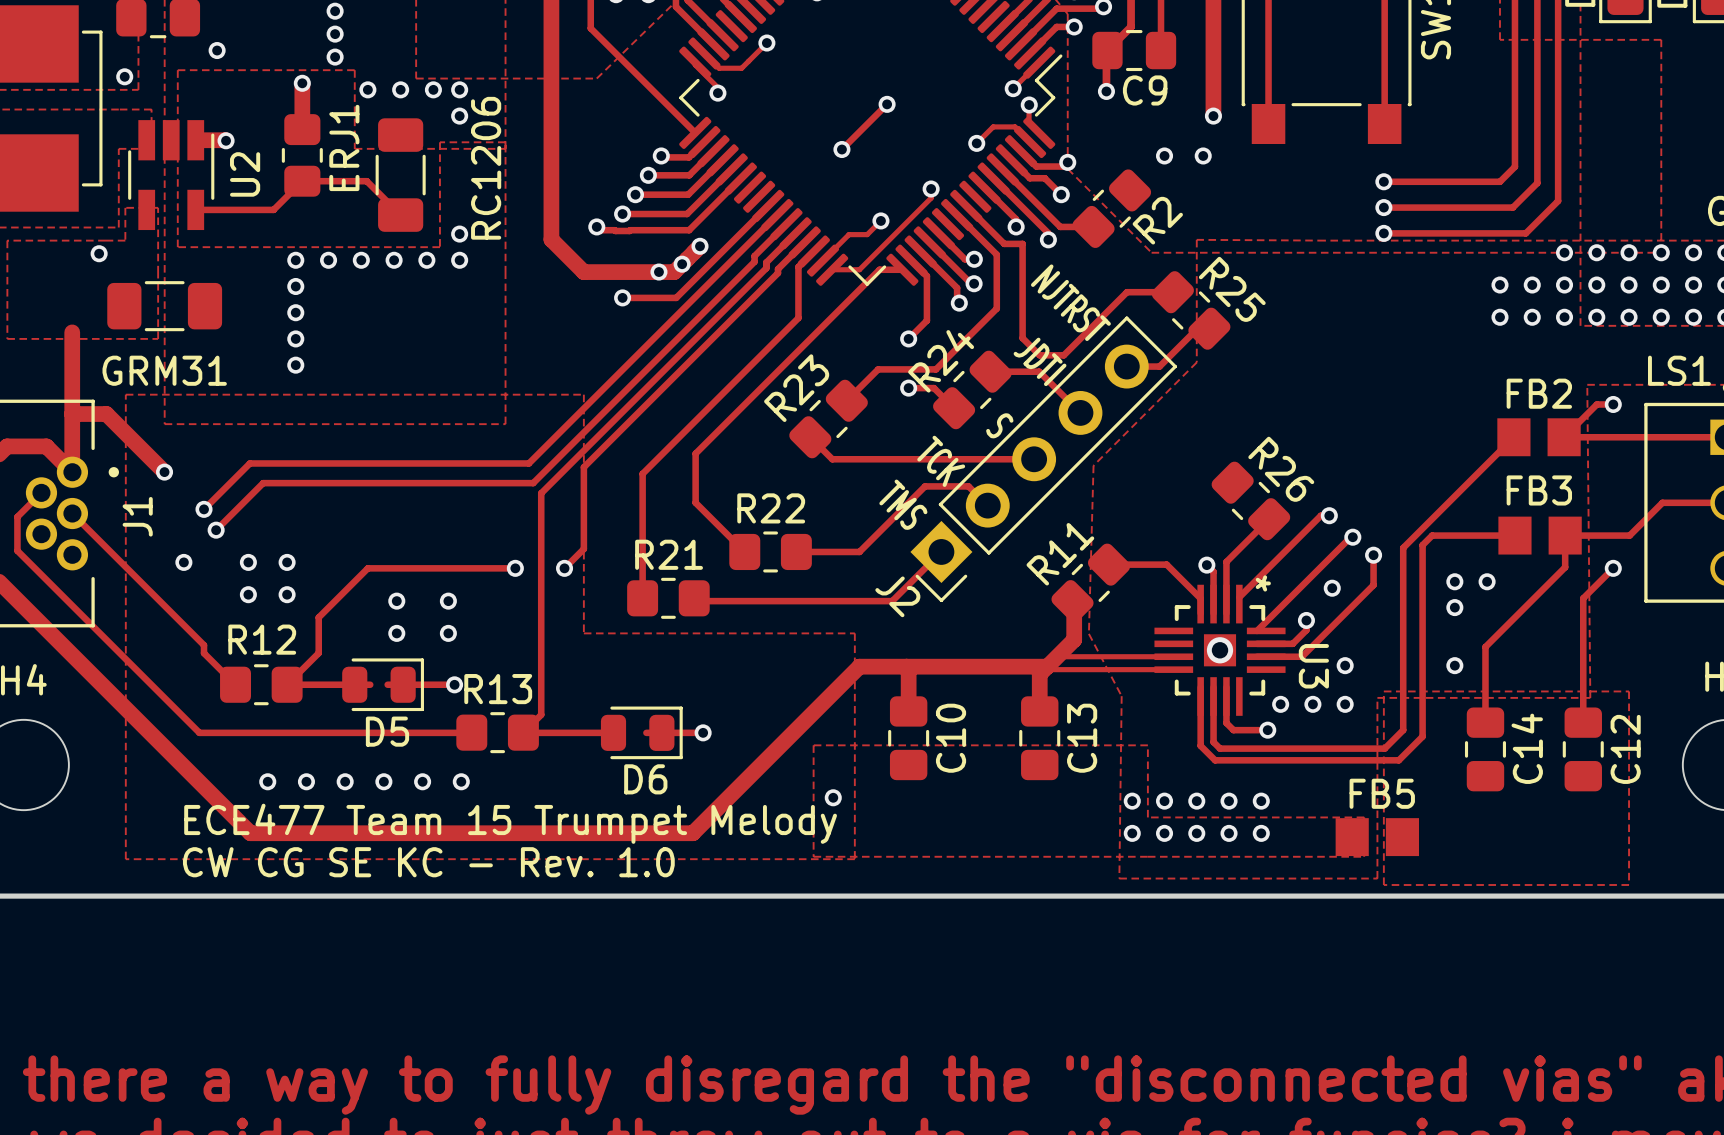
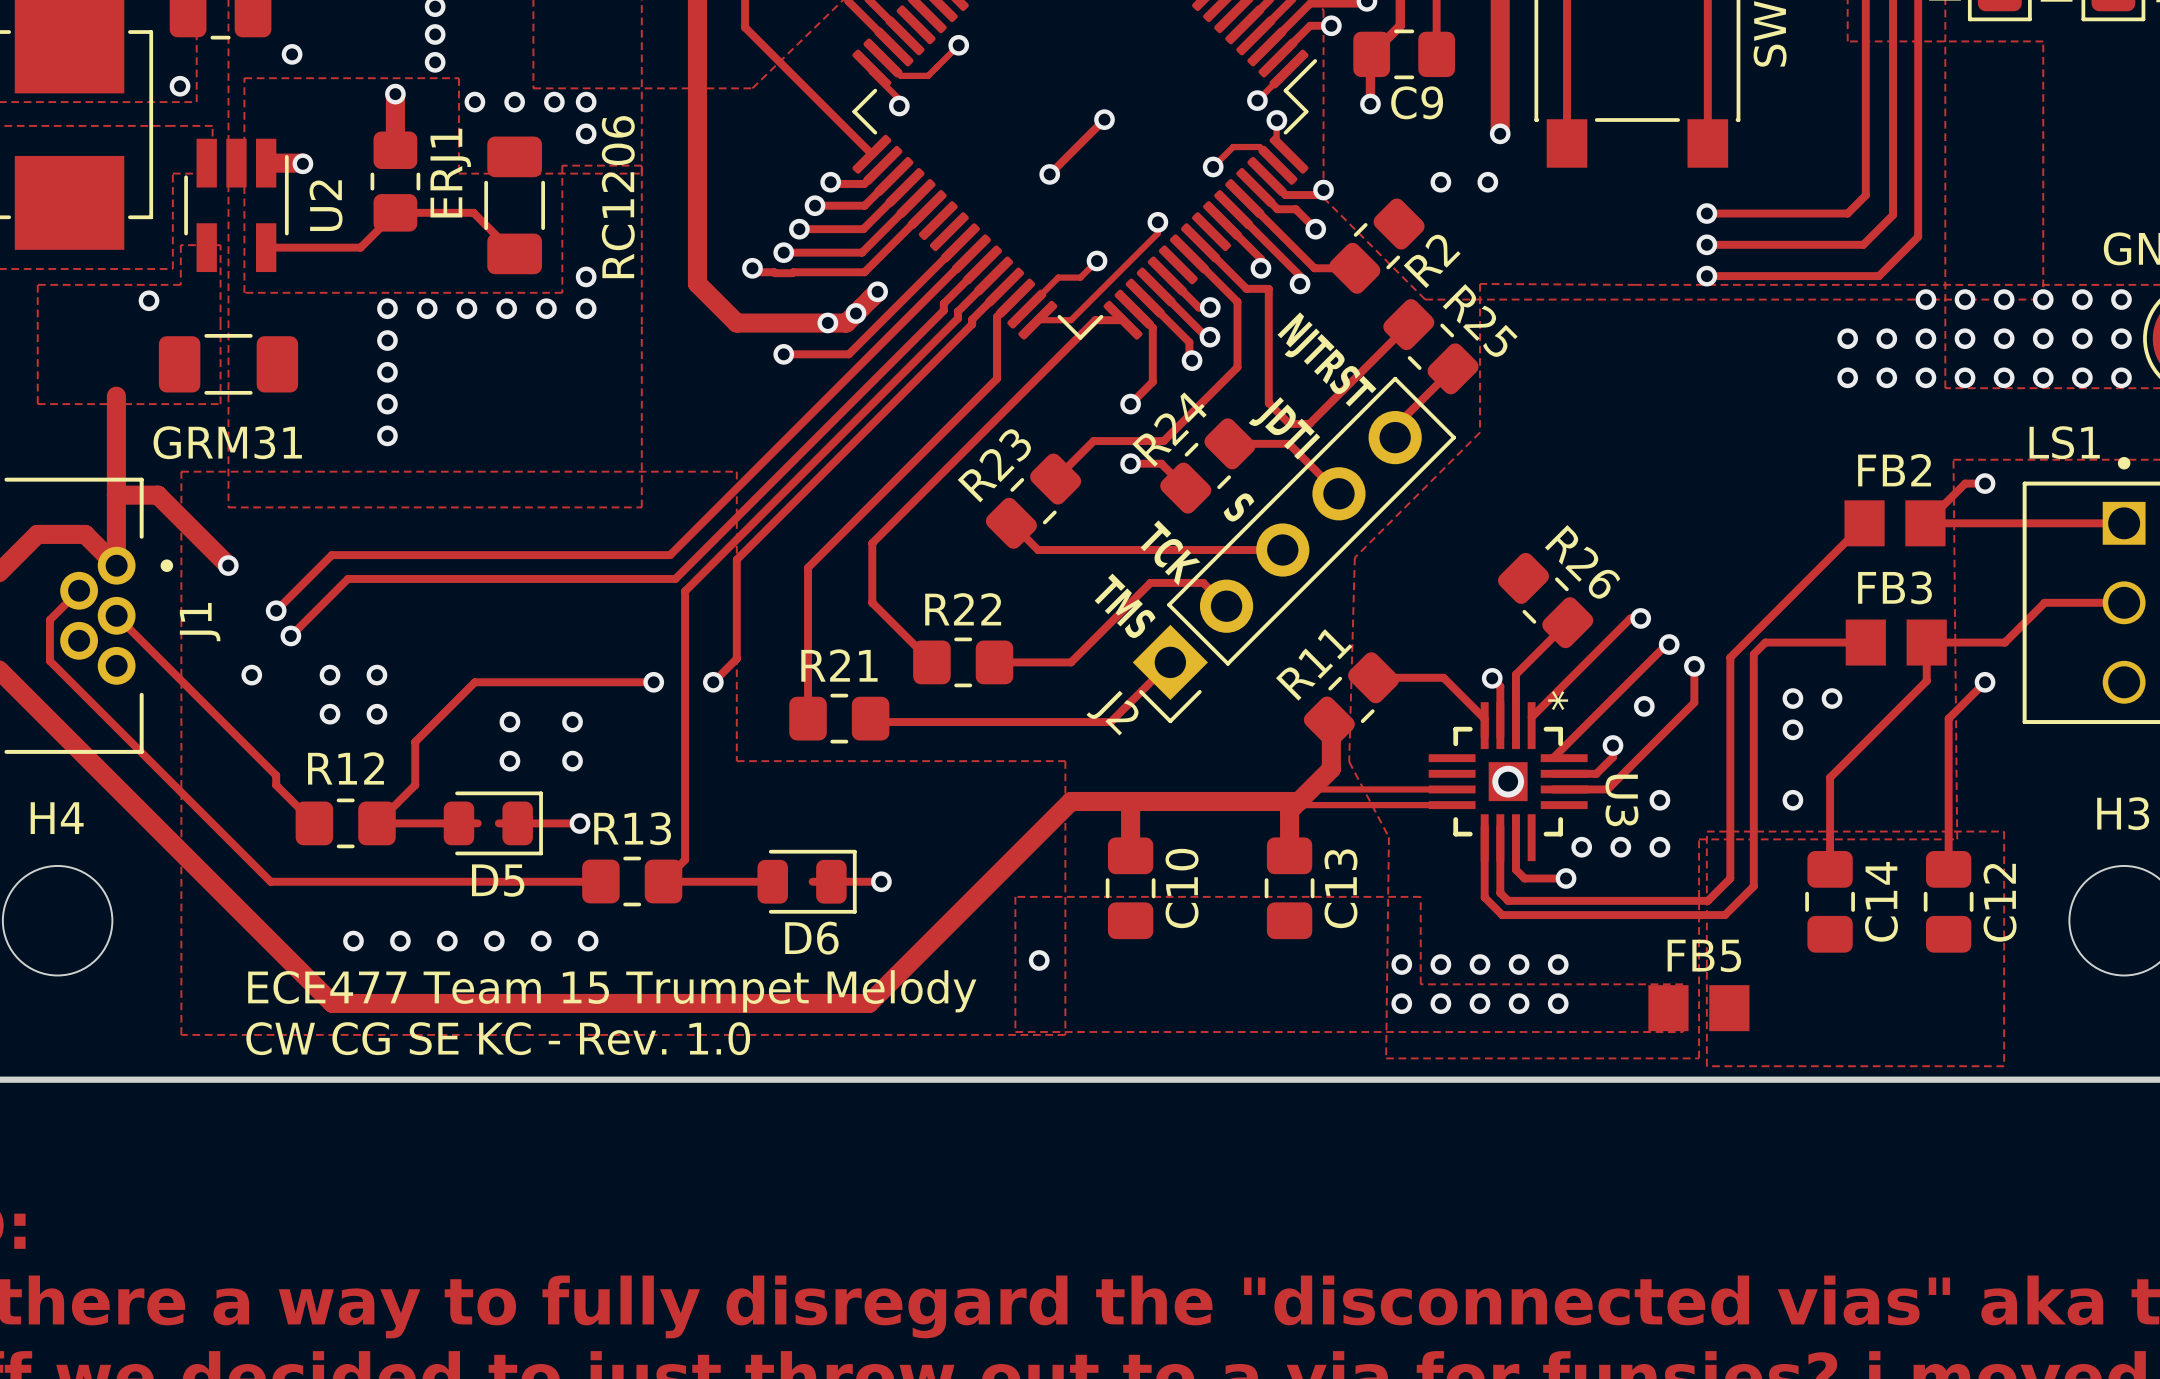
track: (1172, 292) (1126, 292) (1063, 355) (1056, 355) -> (1408, 324) (1309, 423)
R25 position: (1191, 310) -> (1430, 346)
track: (1209, 328) (1197, 328) (1159, 366) (1126, 366) -> (1453, 368) (1395, 426) (1395, 437)

